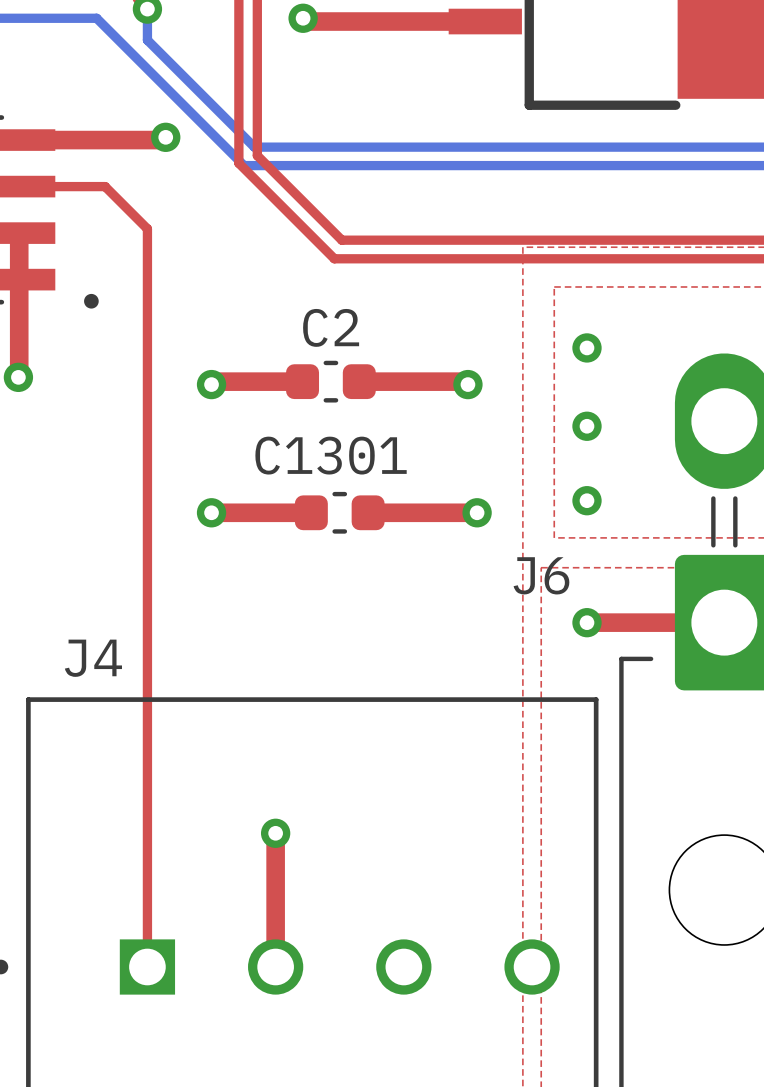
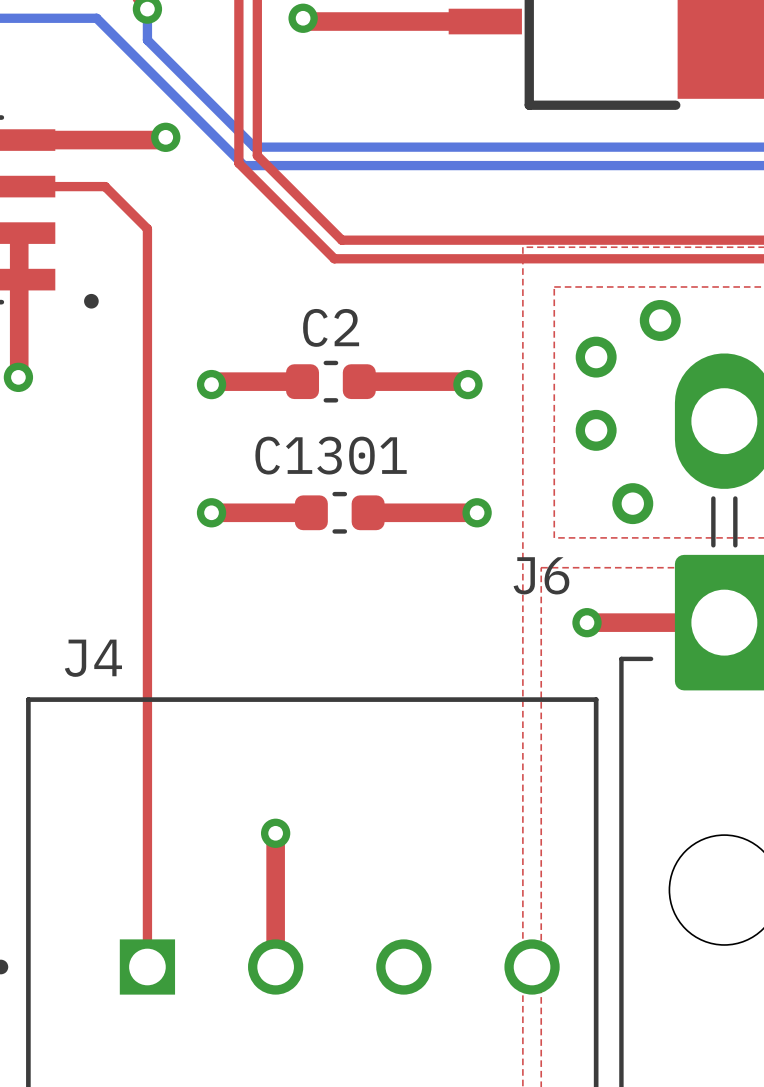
via: none -> (660, 320)
via size: [572, 333, 602, 363] -> [575, 336, 617, 378]
via size: [572, 411, 602, 441] -> [575, 409, 617, 451]
via: (586, 500) -> none
via: none -> (632, 503)

